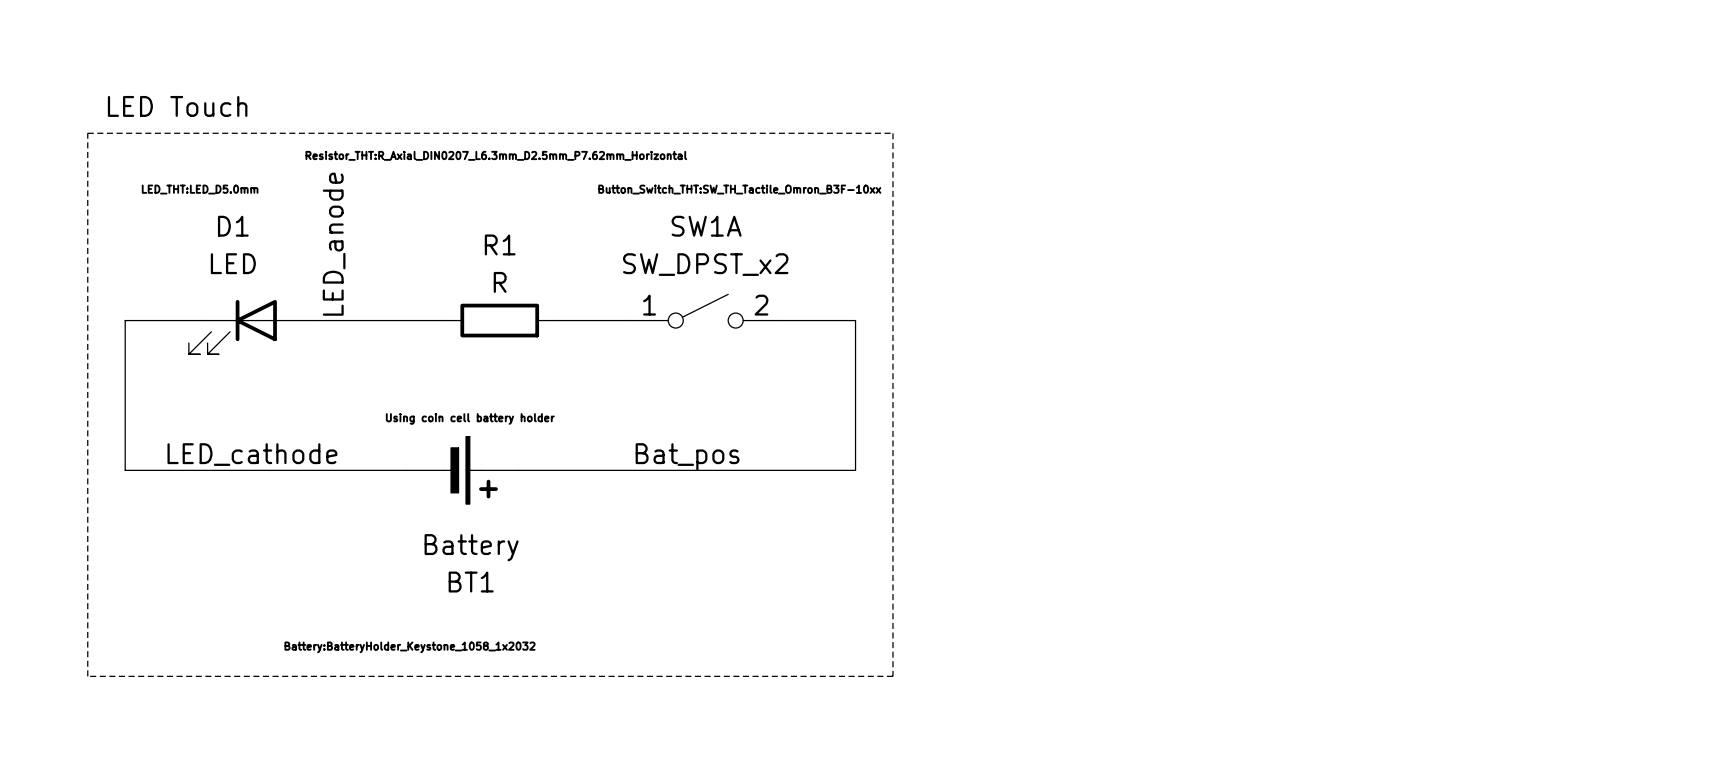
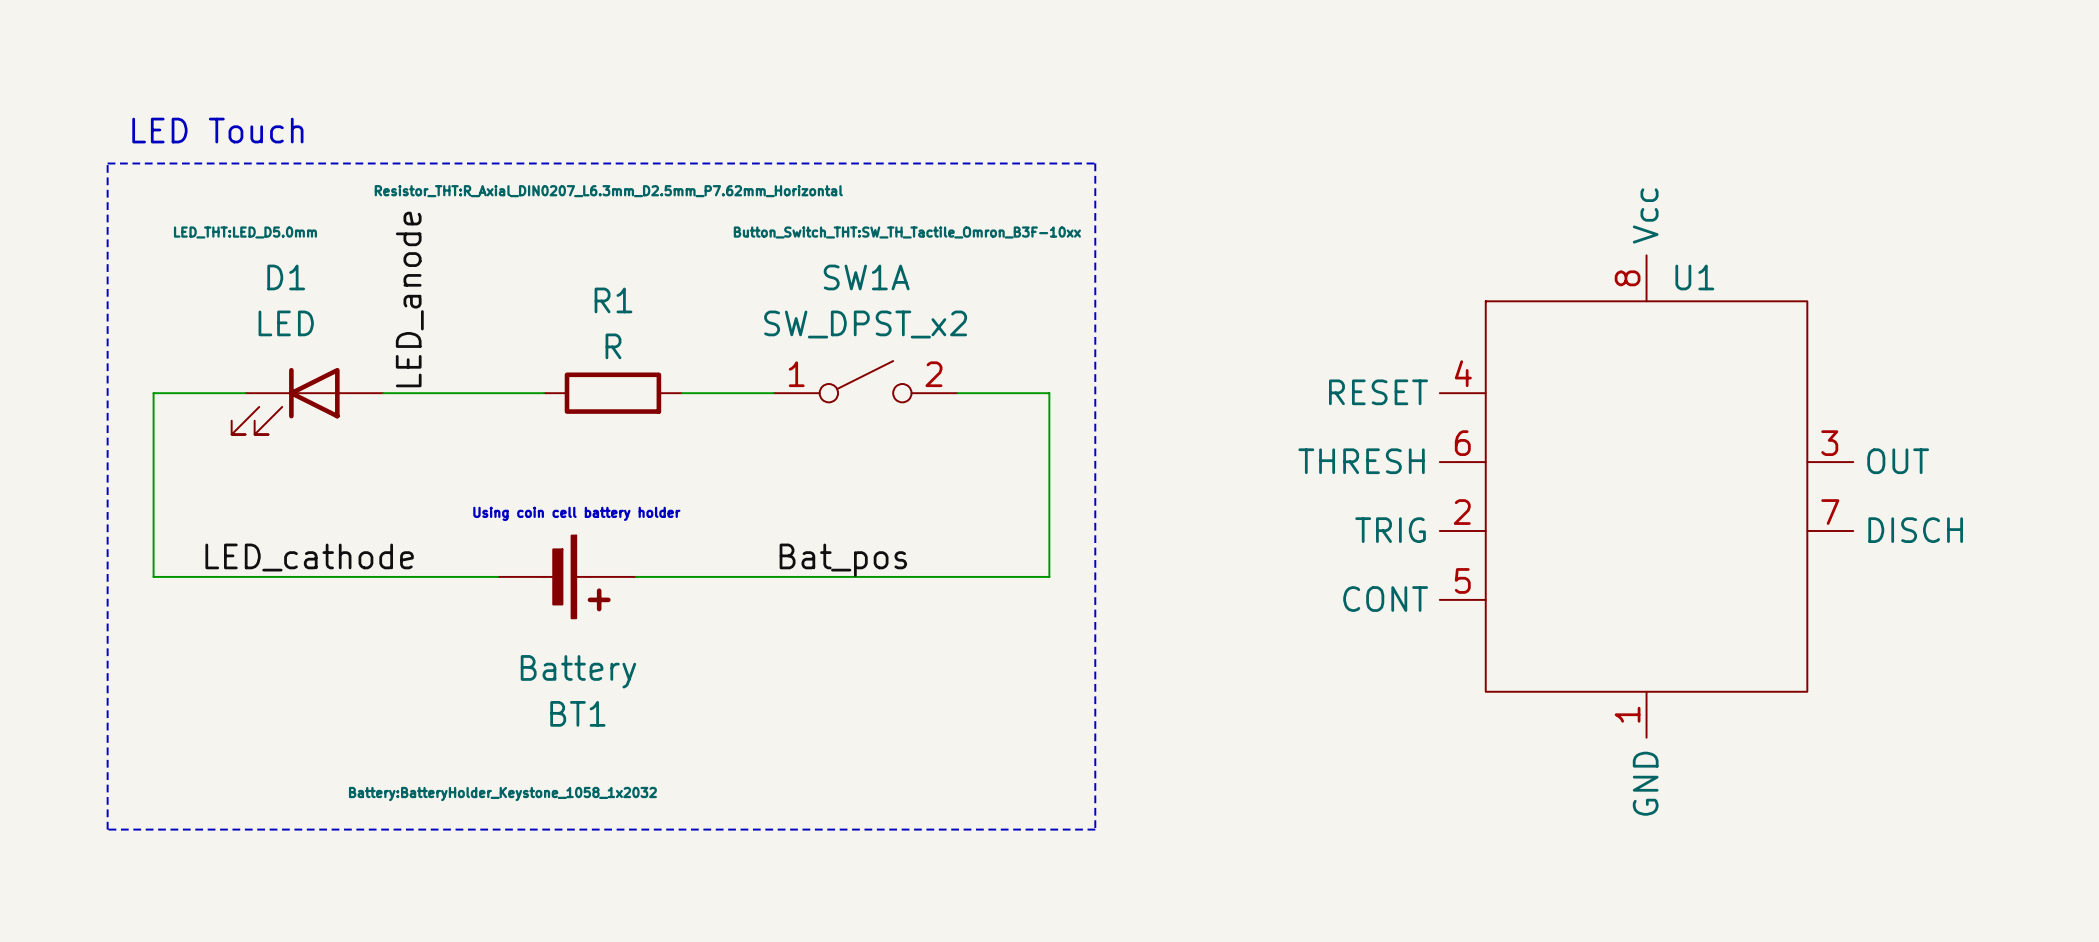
U1: none -> (1646, 496)

